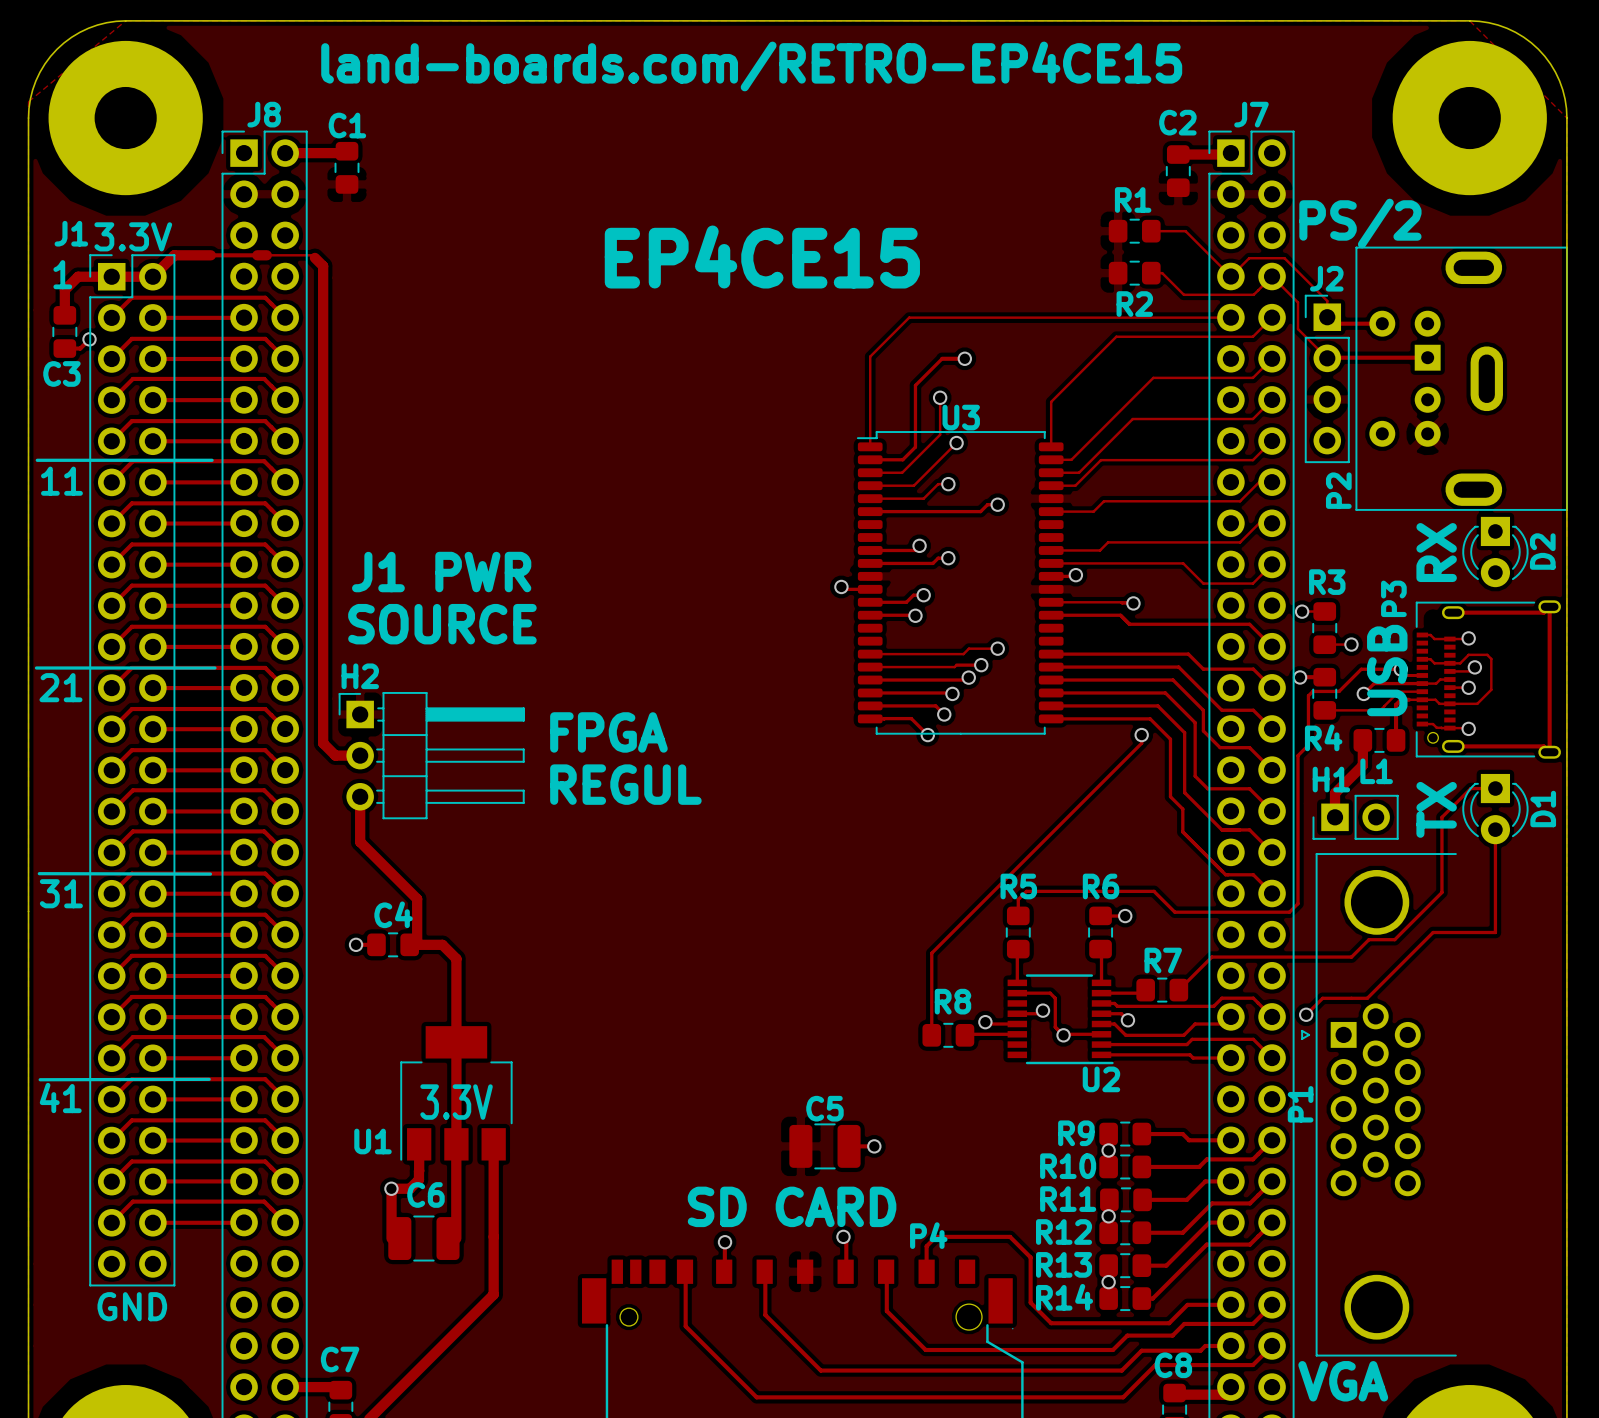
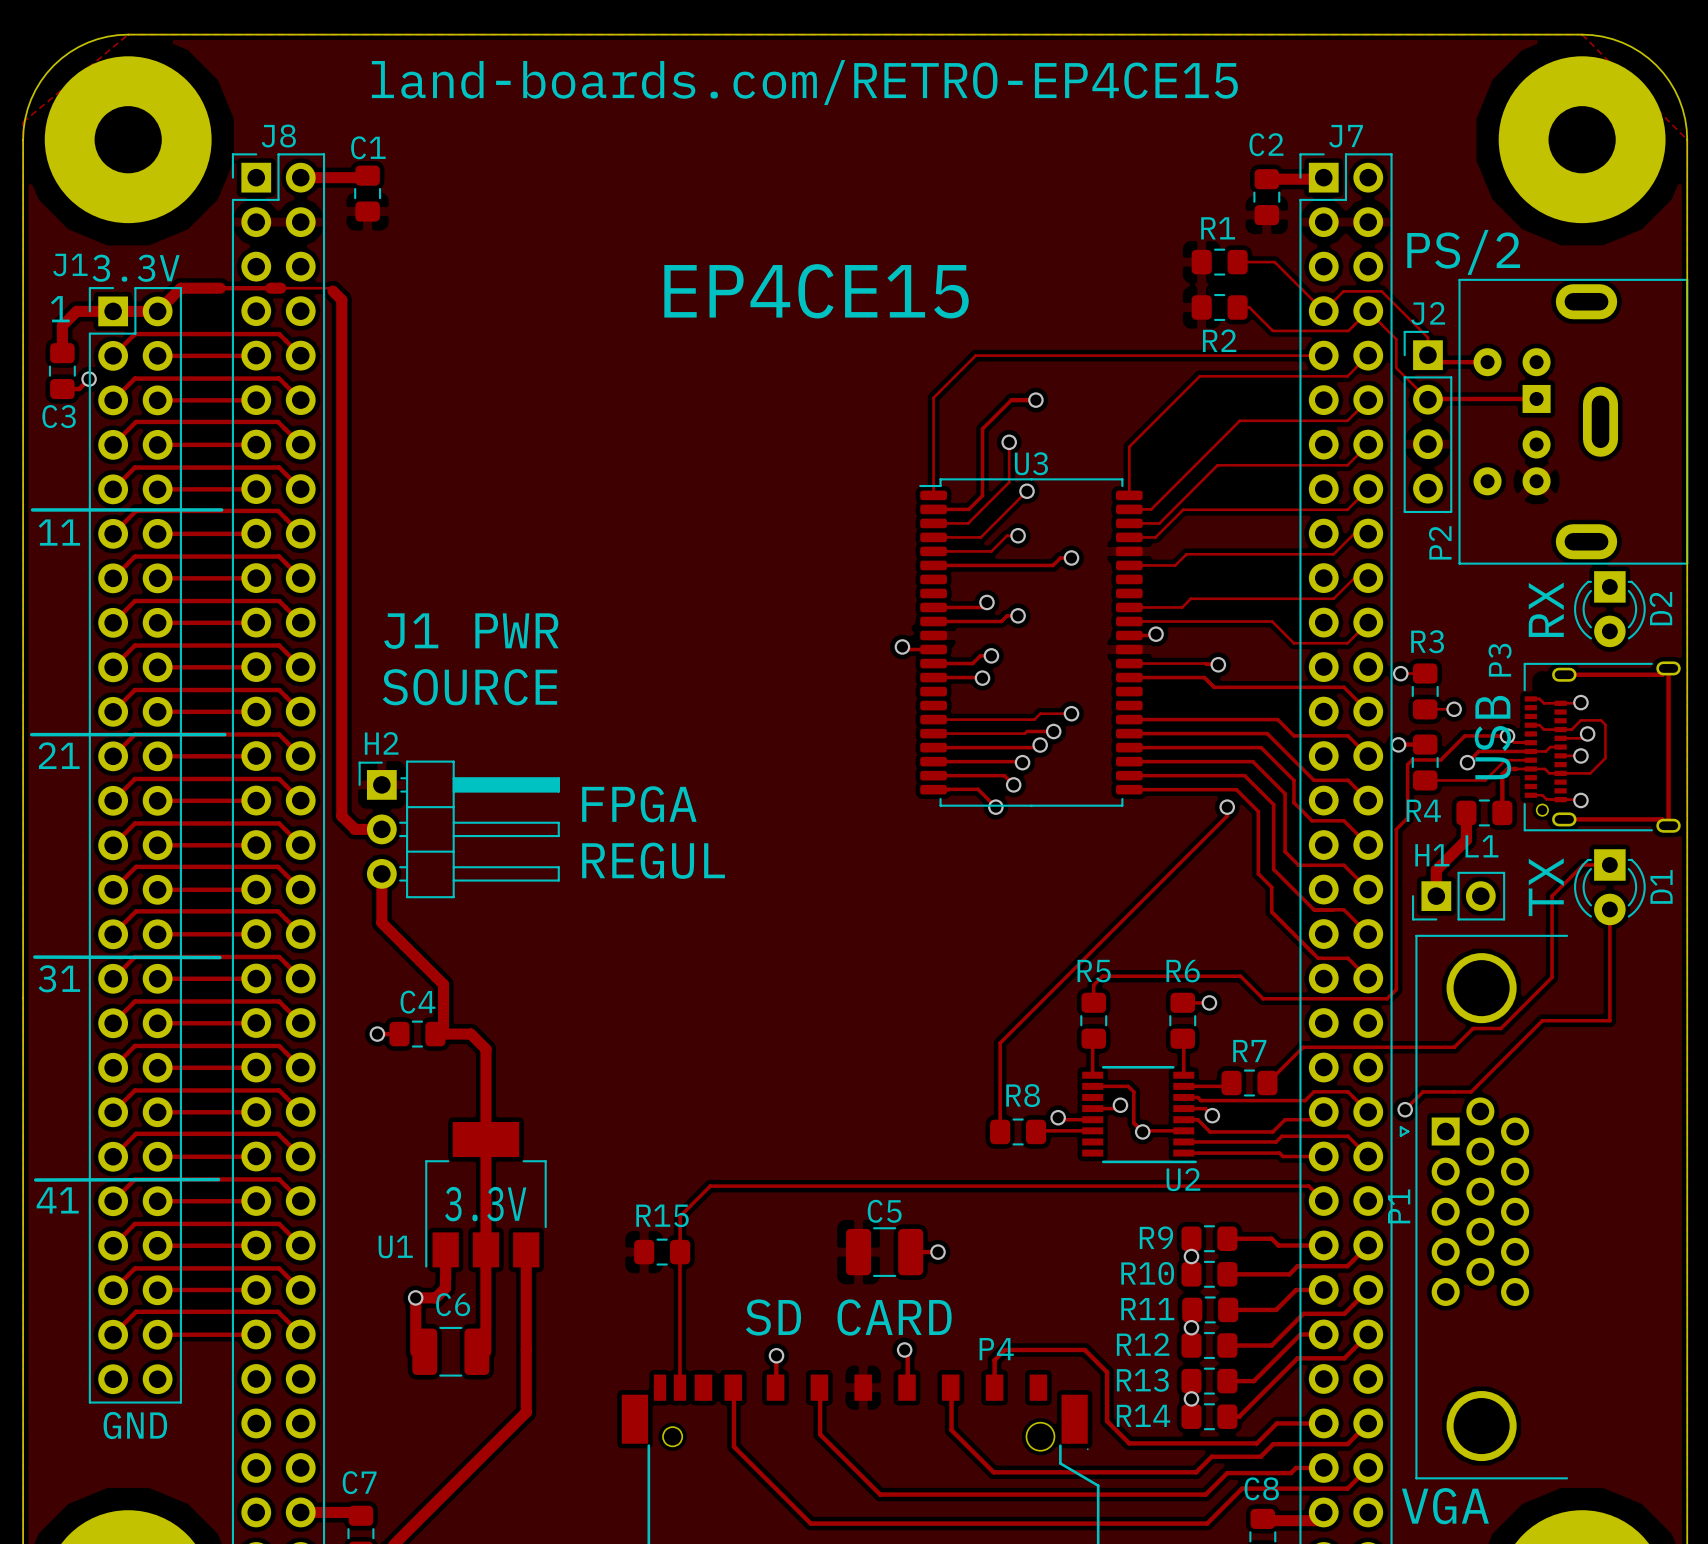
track: none -> (1323, 1201) (1308, 1186) (710, 1186) (680, 1216) (680, 1252)
R15: none -> (662, 1252)
track: none -> (679, 1252) (679, 1387)

